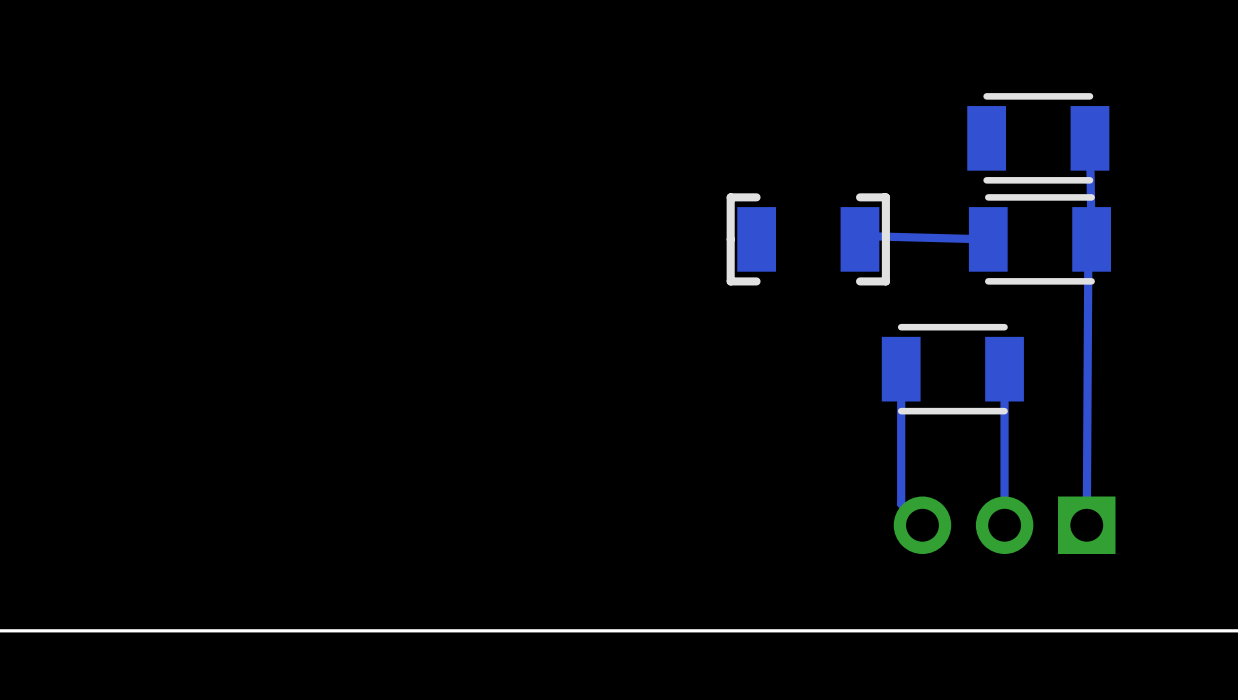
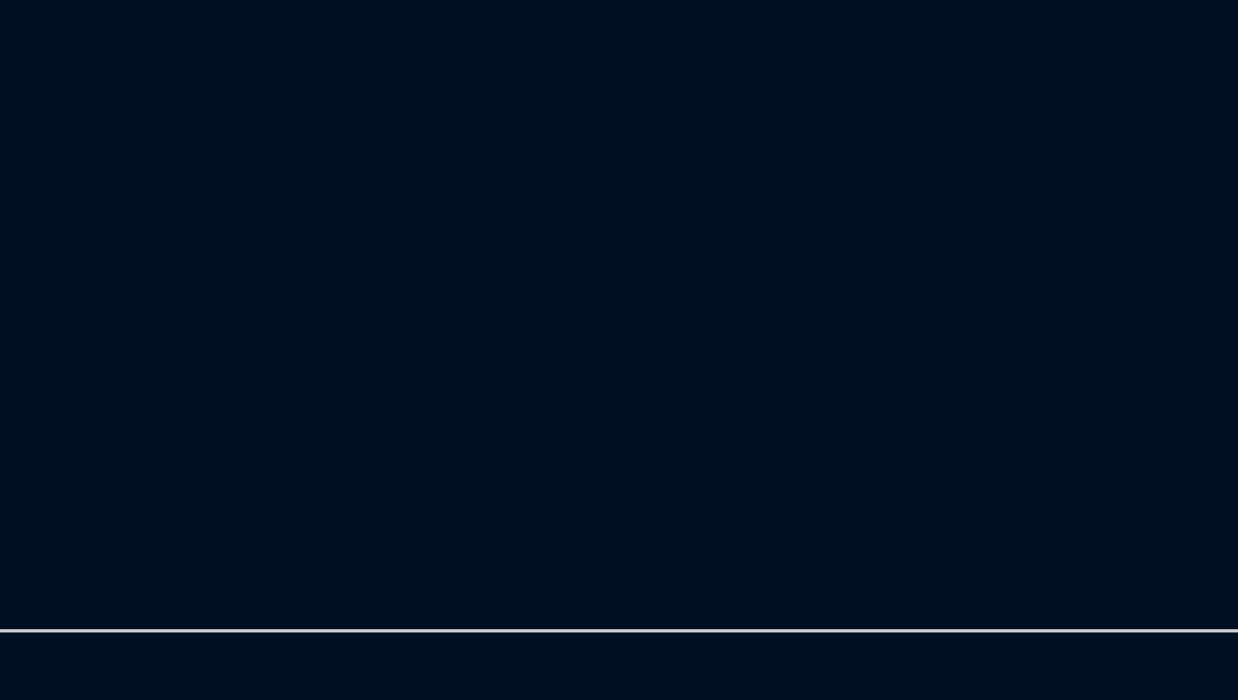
part: (1038, 138) -> none
track: (1089, 138) (1091, 239) (1088, 242) (1086, 525) -> none
part: (808, 239) -> none
track: (988, 239) (863, 236) (859, 239) -> none
part: (1039, 239) -> none
track: (901, 369) (901, 503) (922, 525) -> none
part: (952, 369) -> none
track: (1004, 369) (1004, 525) -> none
part: (1004, 525) -> none

